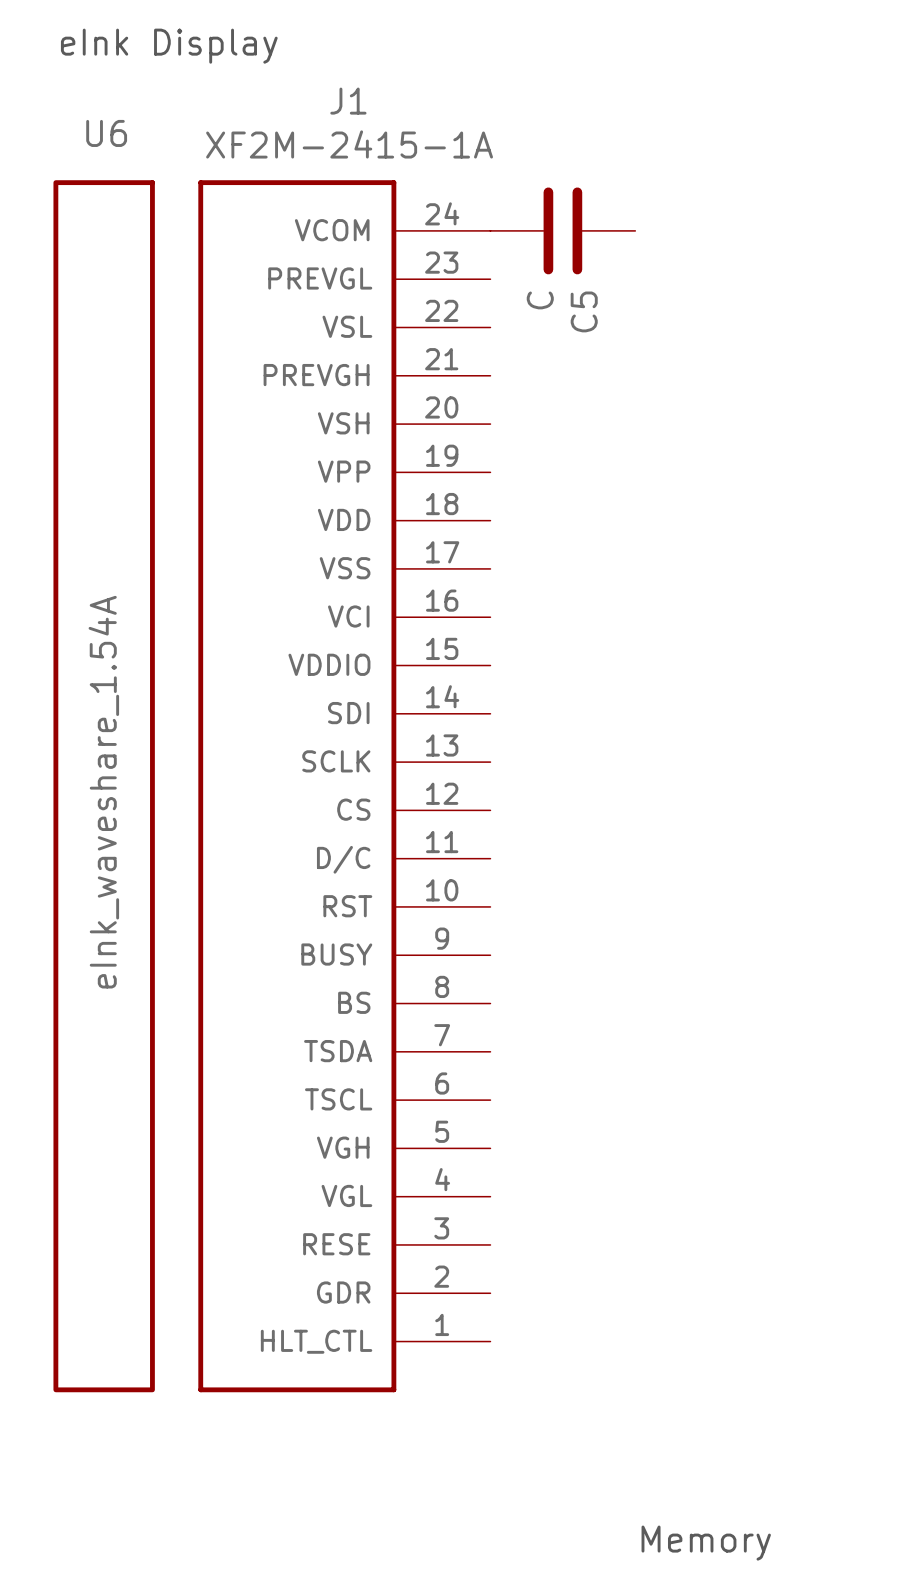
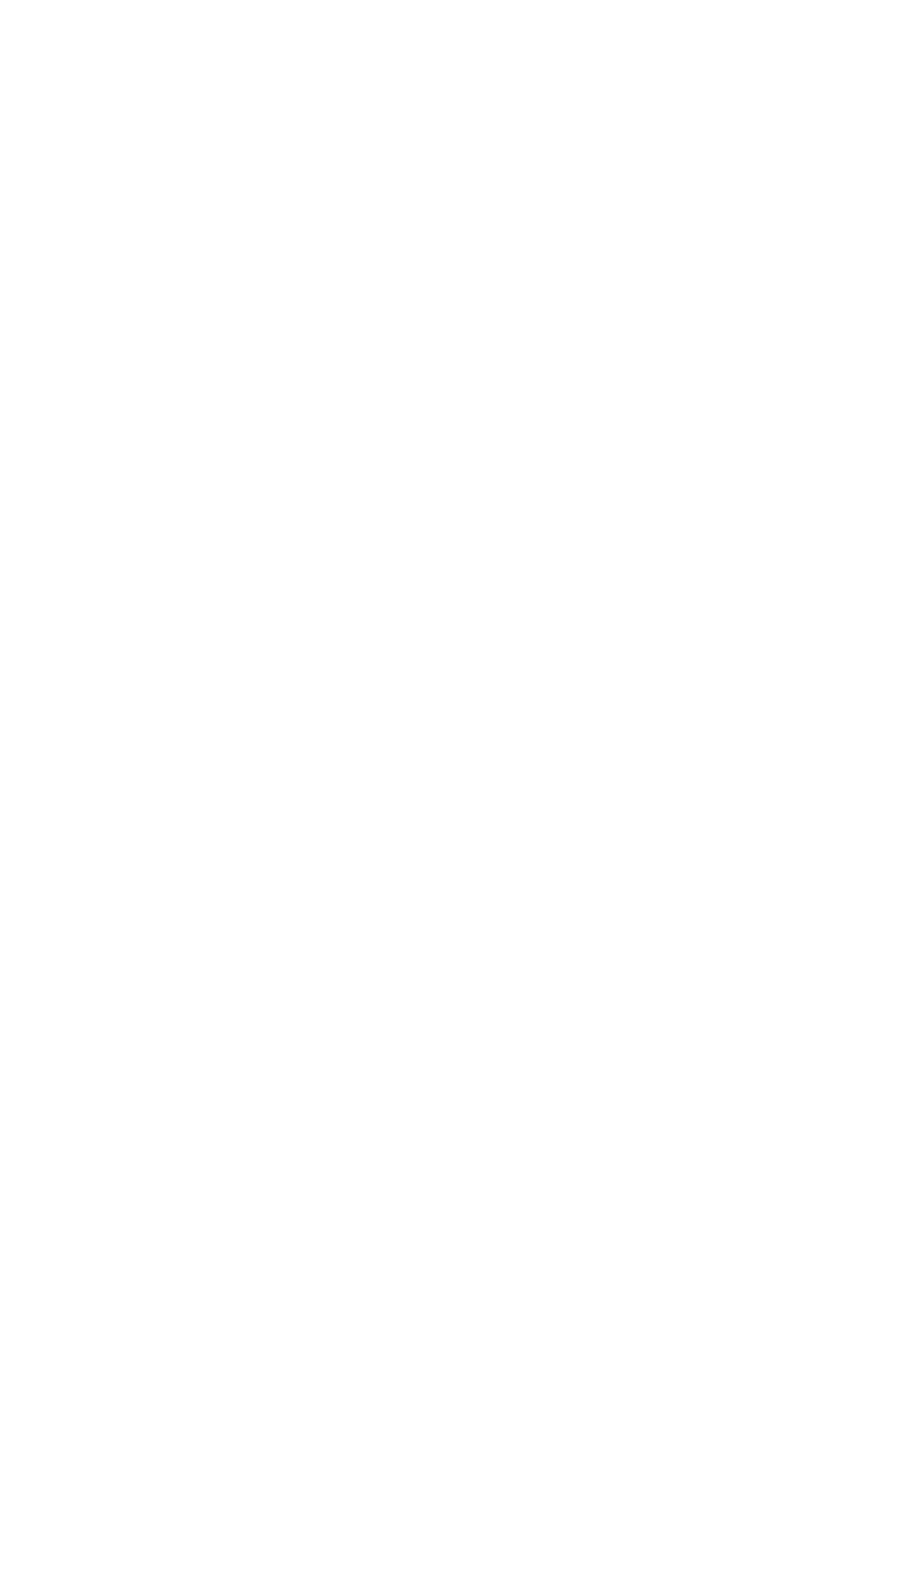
text: eInk Display (169, 46) -> none
C5: C (562, 230) -> none
U6: eInk_waveshare_1.54A (104, 786) -> none
J1: XF2M-2415-1A (344, 786) -> none
text: Memory (706, 1543) -> none

